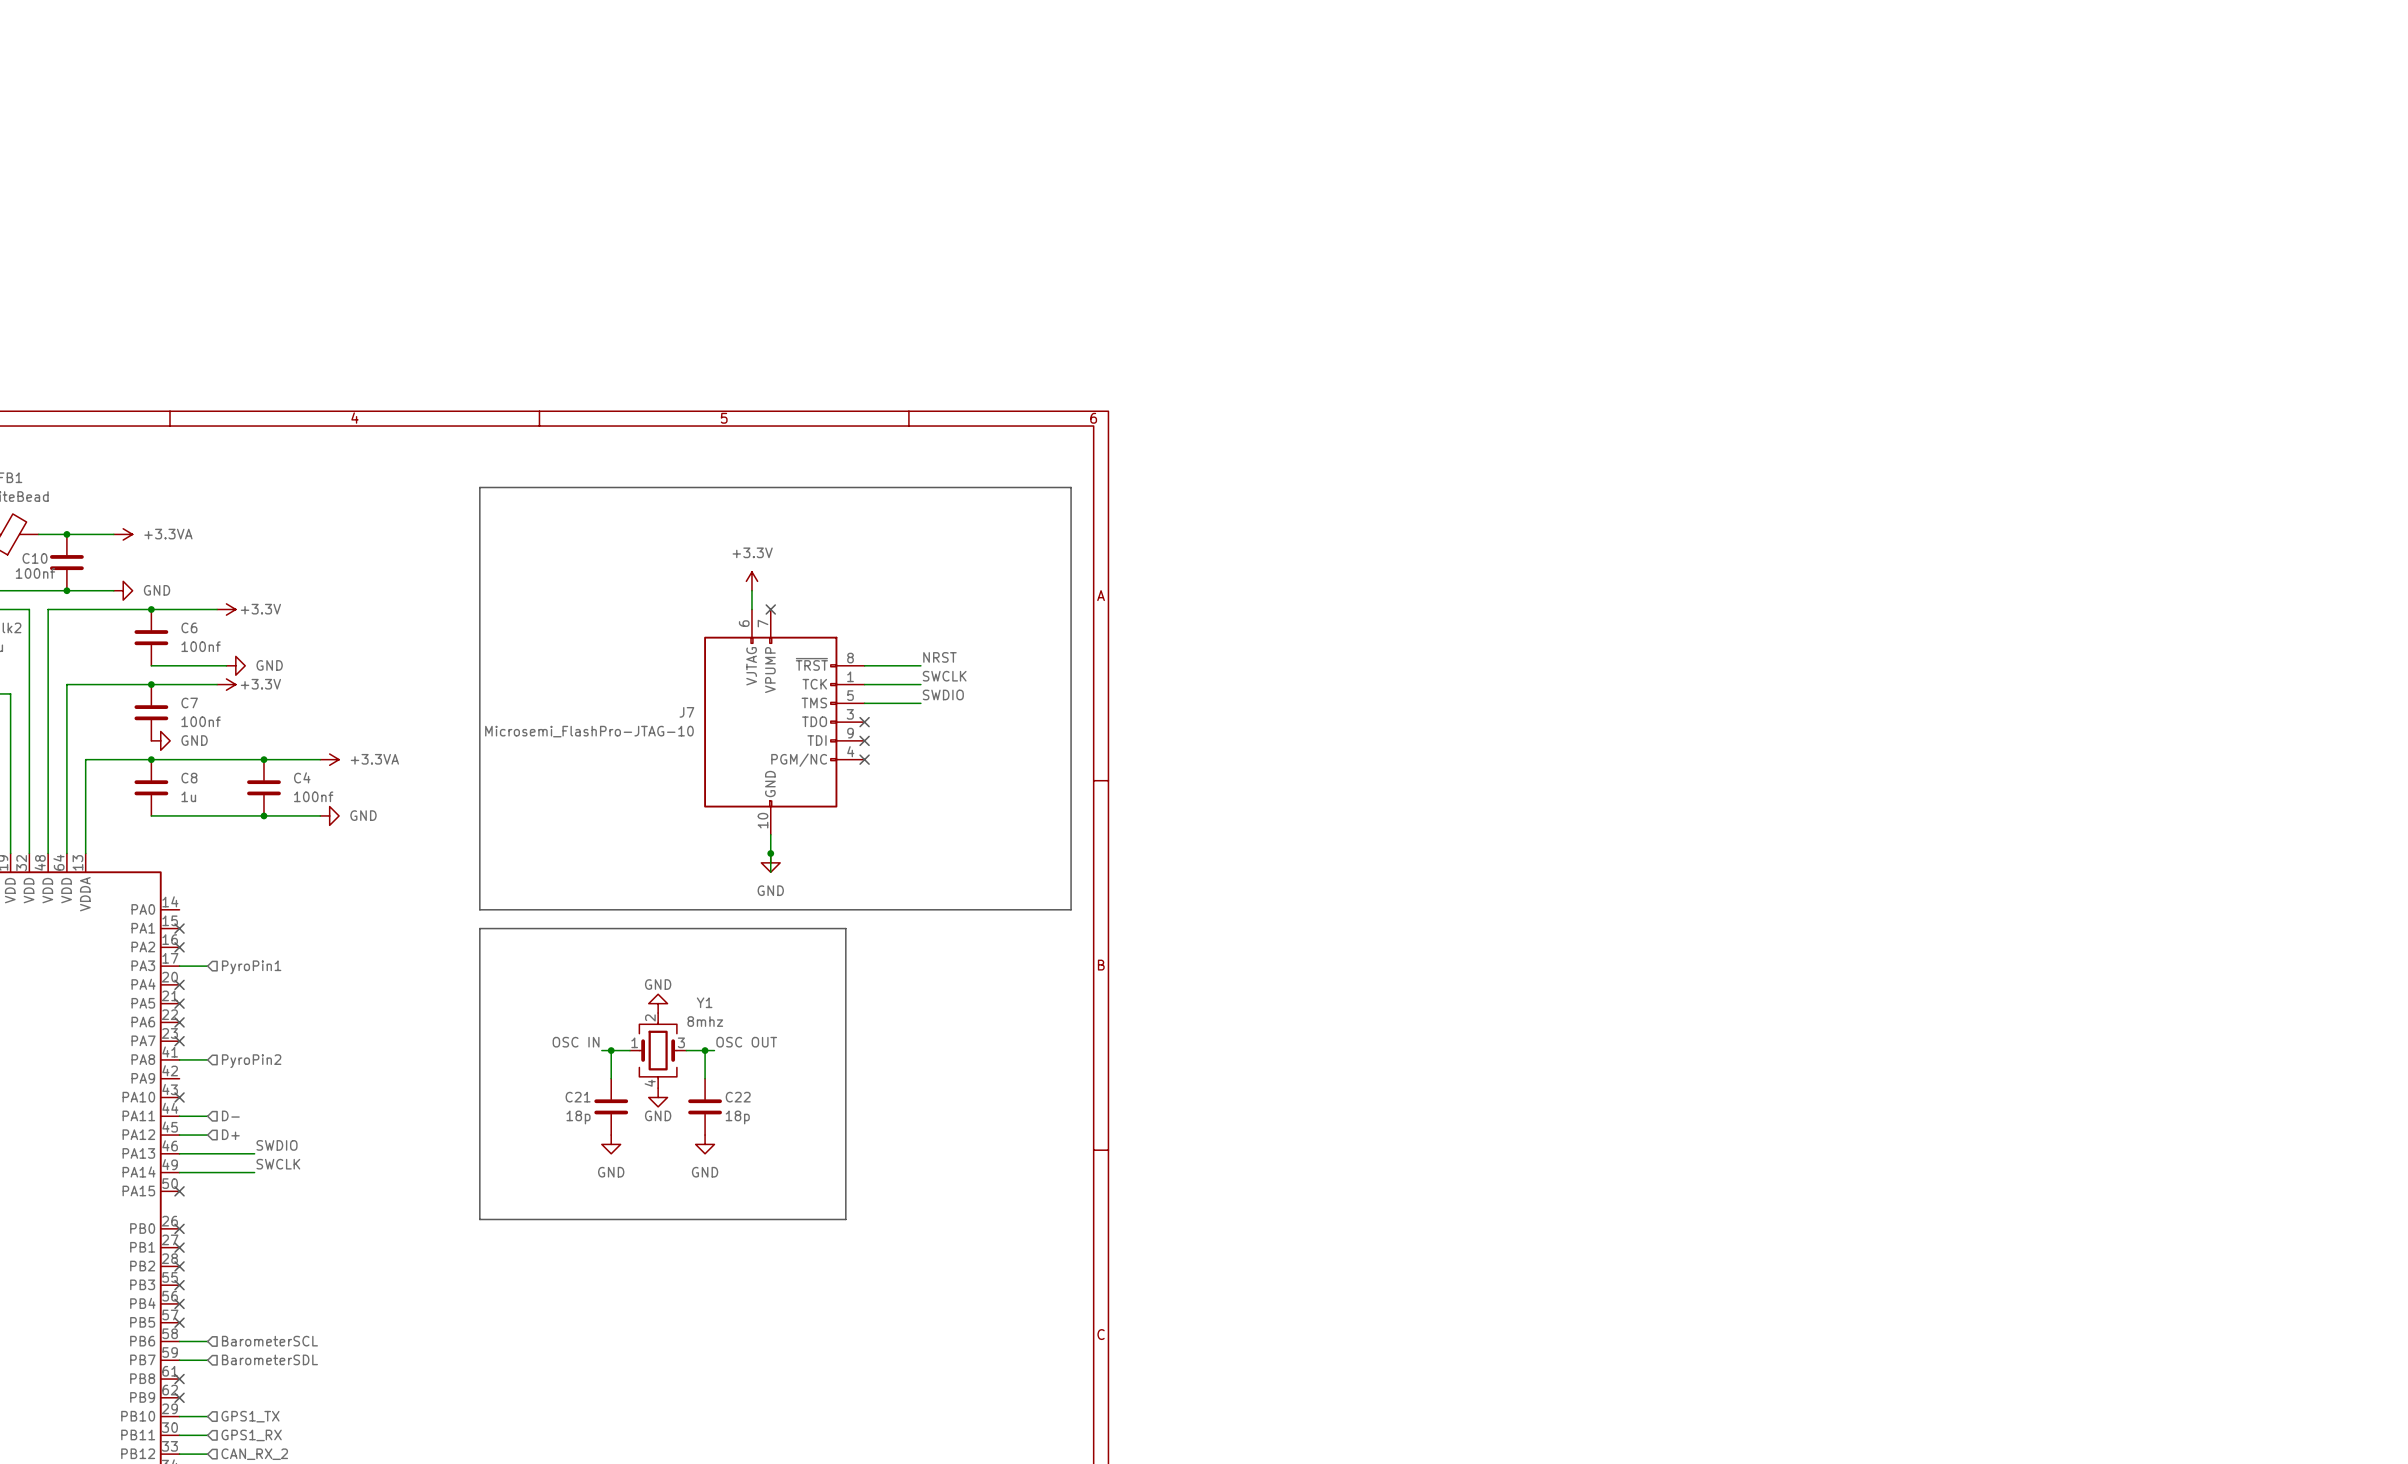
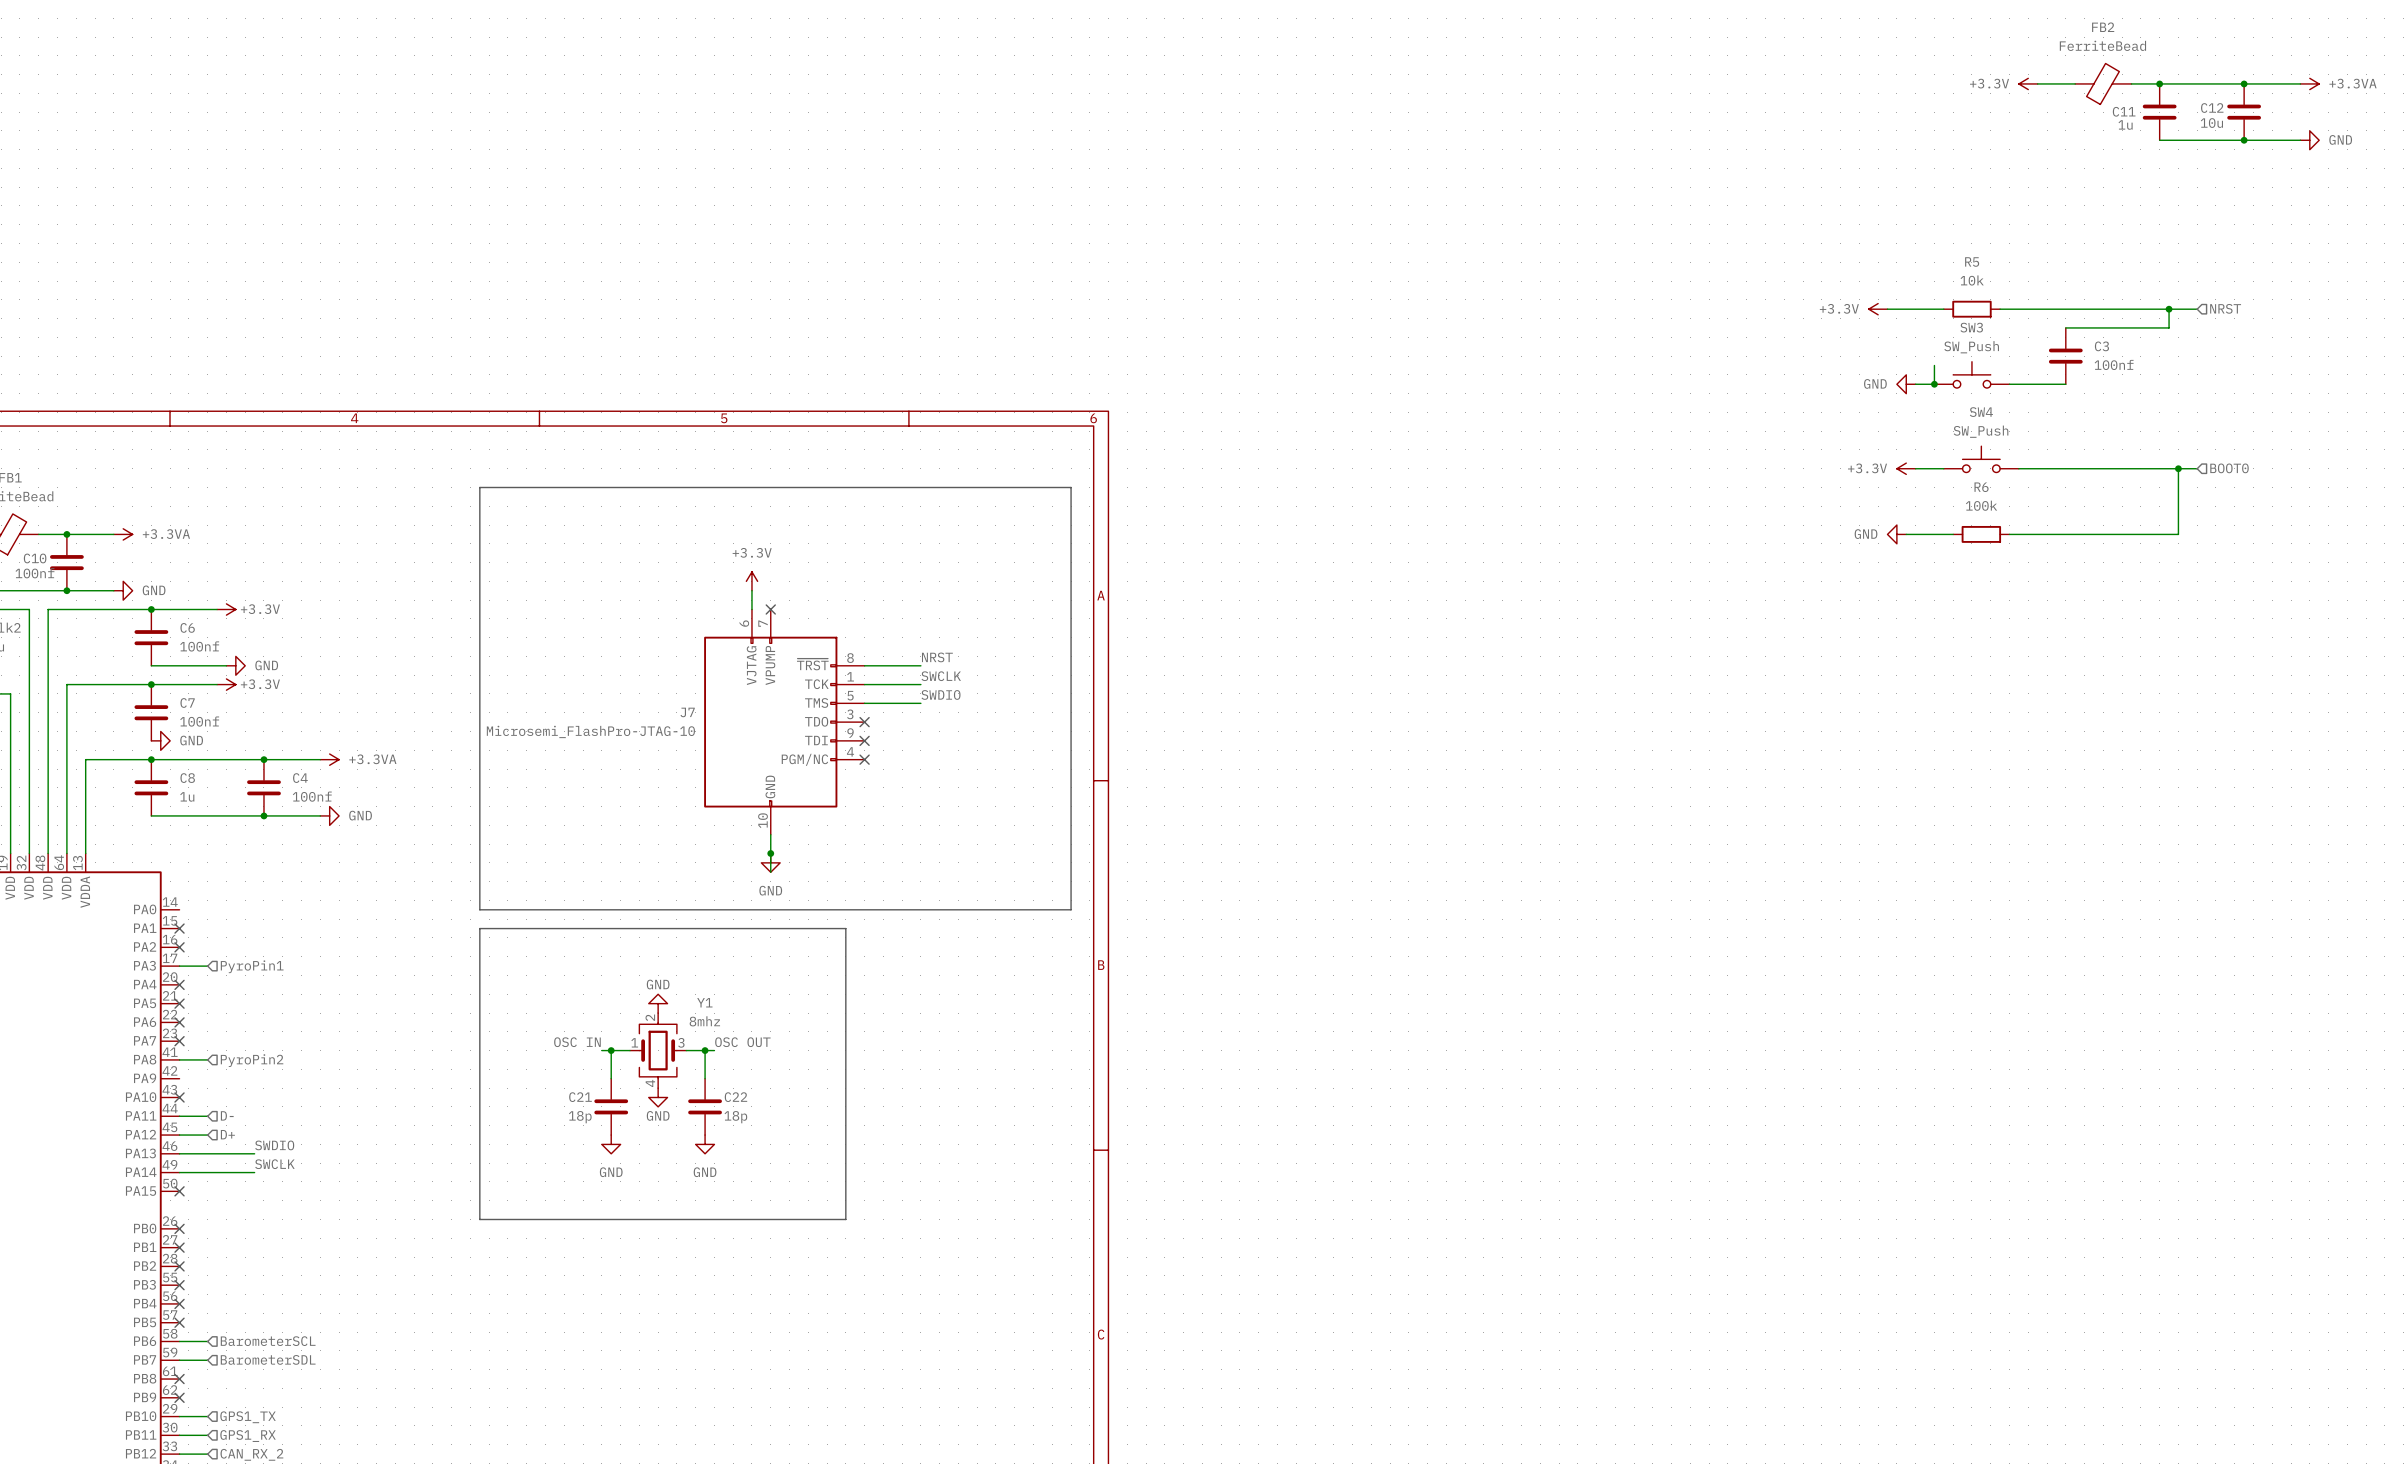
power symbol: none -> +3.3V (2028, 83)
wire: none -> (2037, 83) (2075, 83)
FB2: none -> FerriteBead (2103, 83)
wire: none -> (2131, 83) (2300, 83)
junction: none -> (2159, 83)
junction: none -> (2244, 83)
power symbol: none -> +3.3VA (2309, 83)
C11: none -> 1u (2159, 112)
C12: none -> 10u (2244, 112)
wire: none -> (2159, 140) (2300, 140)
junction: none -> (2244, 140)
power symbol: none -> GND (2309, 140)
hierarchical label: none -> NRST (2225, 308)
power symbol: none -> +3.3V (1878, 309)
wire: none -> (1887, 309) (1943, 309)
R5: none -> 10k (1971, 309)
wire: none -> (2000, 309) (2197, 309)
wire: none -> (2169, 309) (2169, 327) (2065, 327)
junction: none -> (2169, 309)
C3: none -> 100nf (2065, 356)
wire: none -> (1934, 365) (1934, 384) (1915, 384)
SW3: none -> SW_Push (1971, 374)
power symbol: none -> GND (1906, 384)
junction: none -> (1934, 384)
wire: none -> (2009, 384) (2065, 384)
SW4: none -> SW_Push (1981, 459)
power symbol: none -> +3.3V (1906, 468)
wire: none -> (1915, 468) (1943, 468)
wire: none -> (2018, 468) (2197, 468)
wire: none -> (2178, 468) (2178, 534) (2009, 534)
junction: none -> (2178, 468)
hierarchical label: none -> BOOT0 (2229, 468)
power symbol: none -> GND (1896, 534)
wire: none -> (1906, 534) (1953, 534)
R6: none -> 100k (1981, 534)

